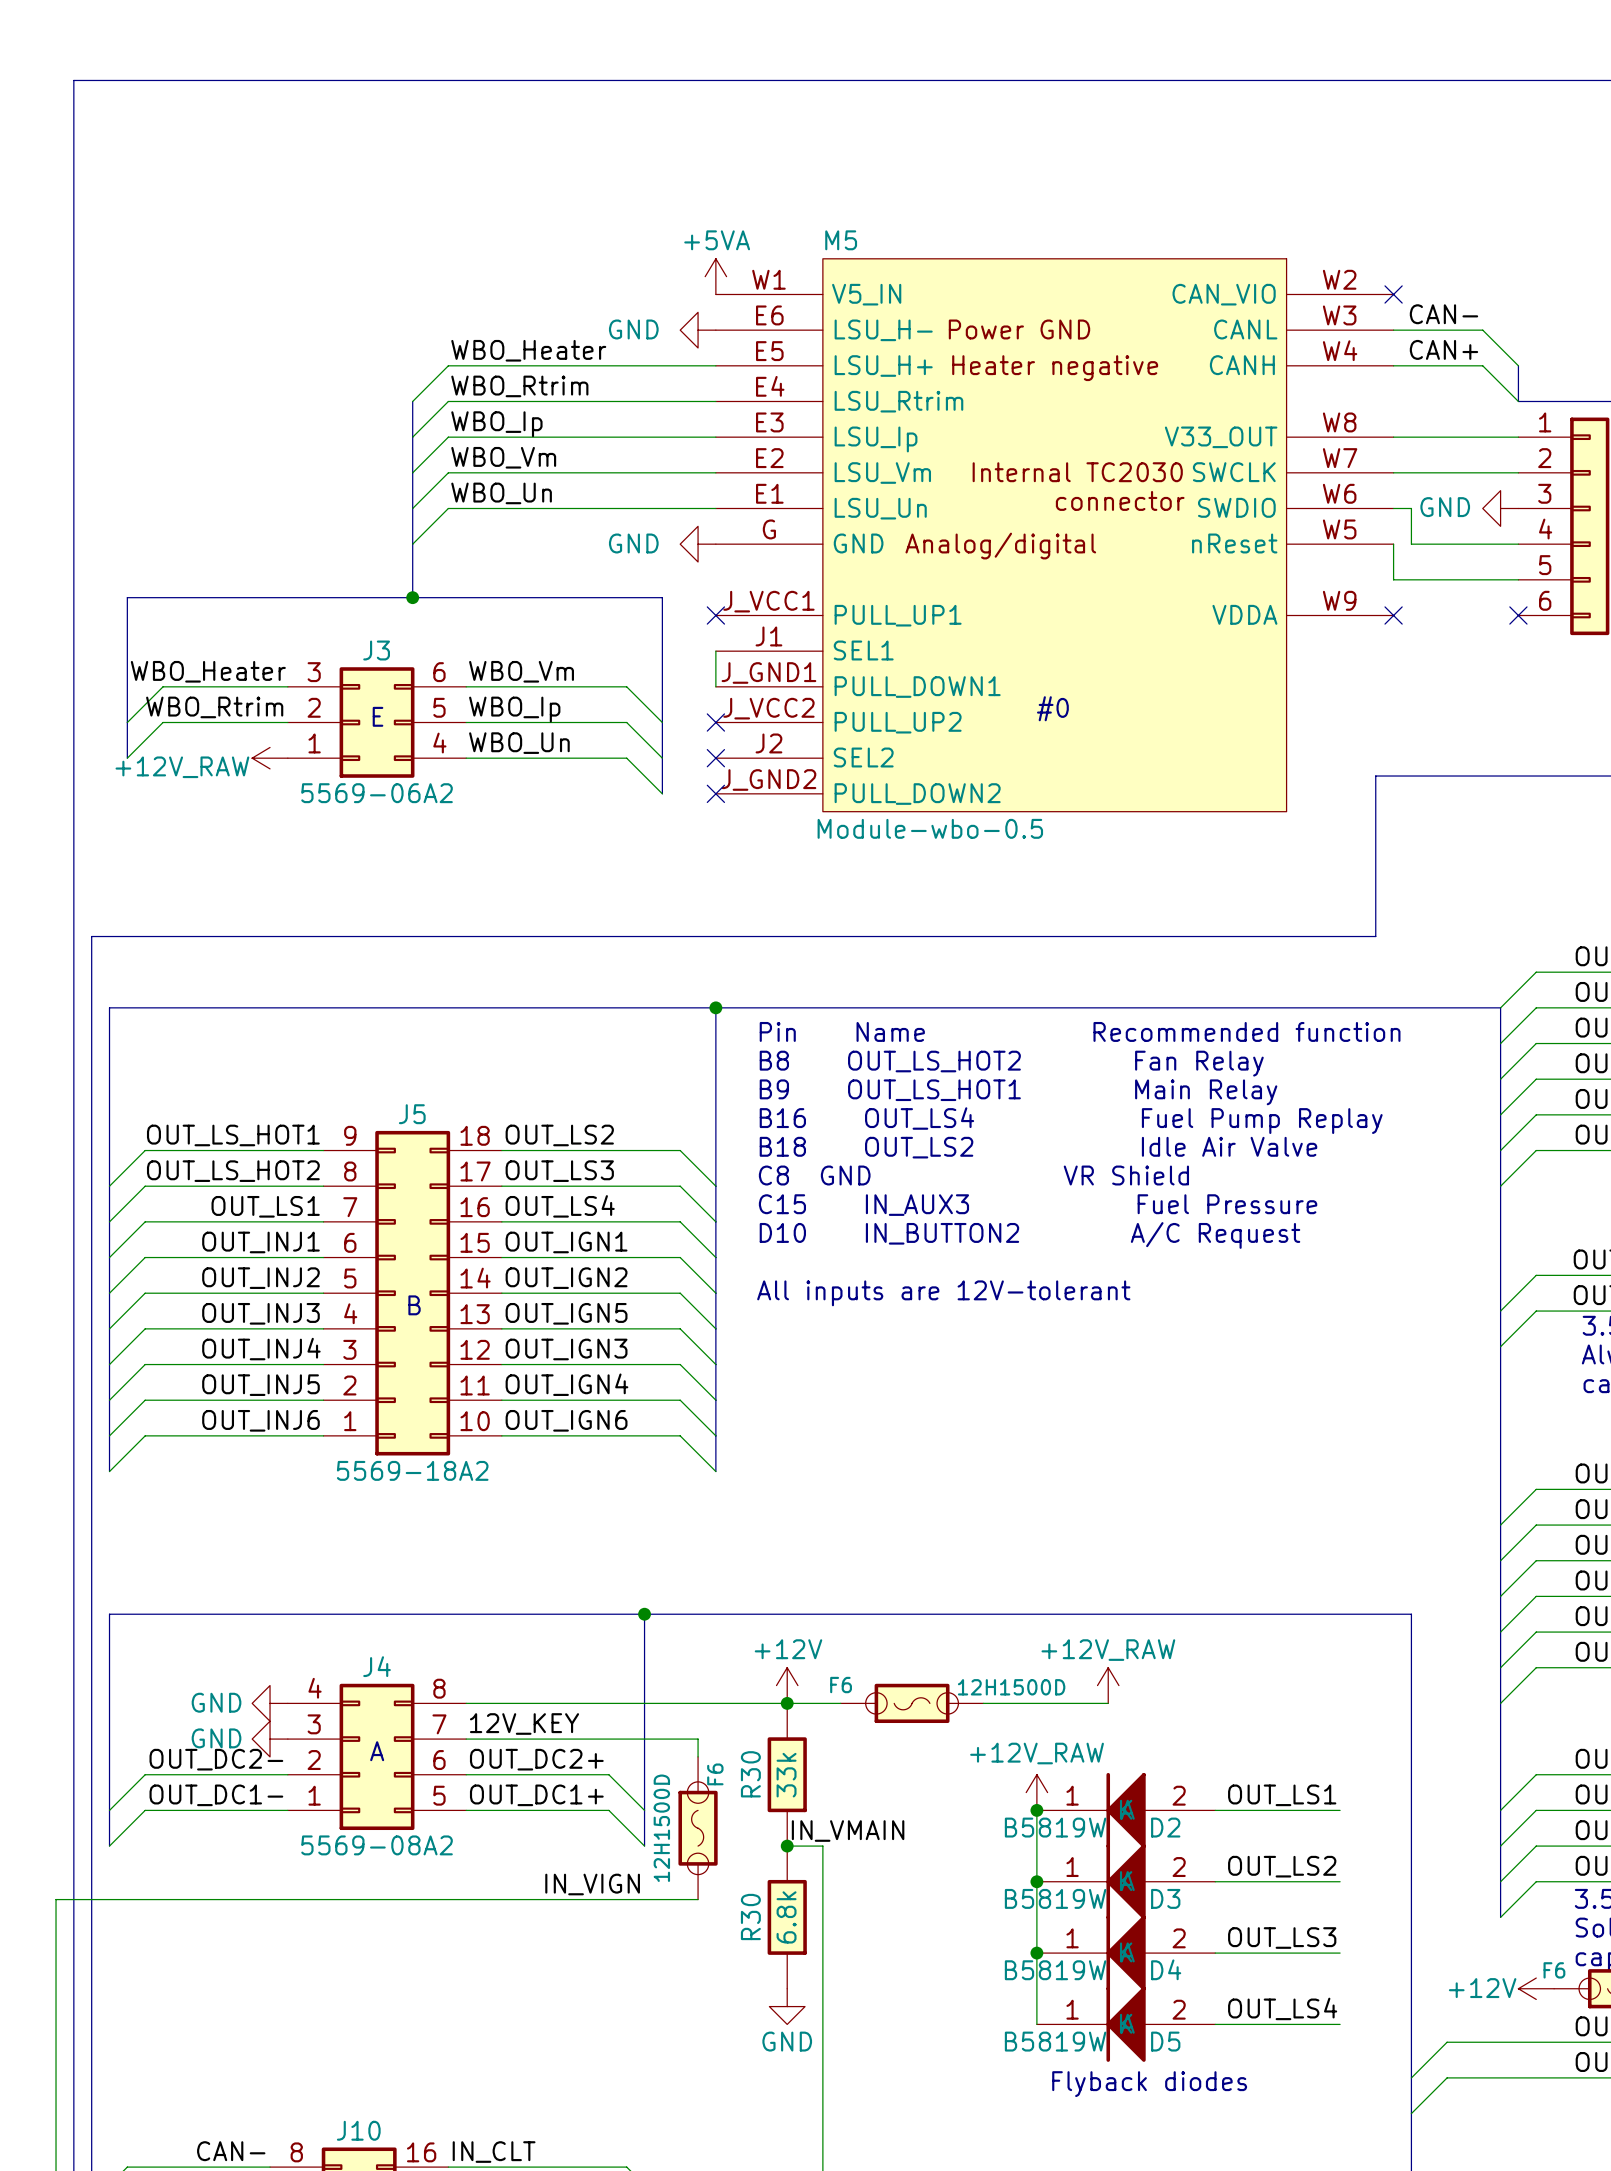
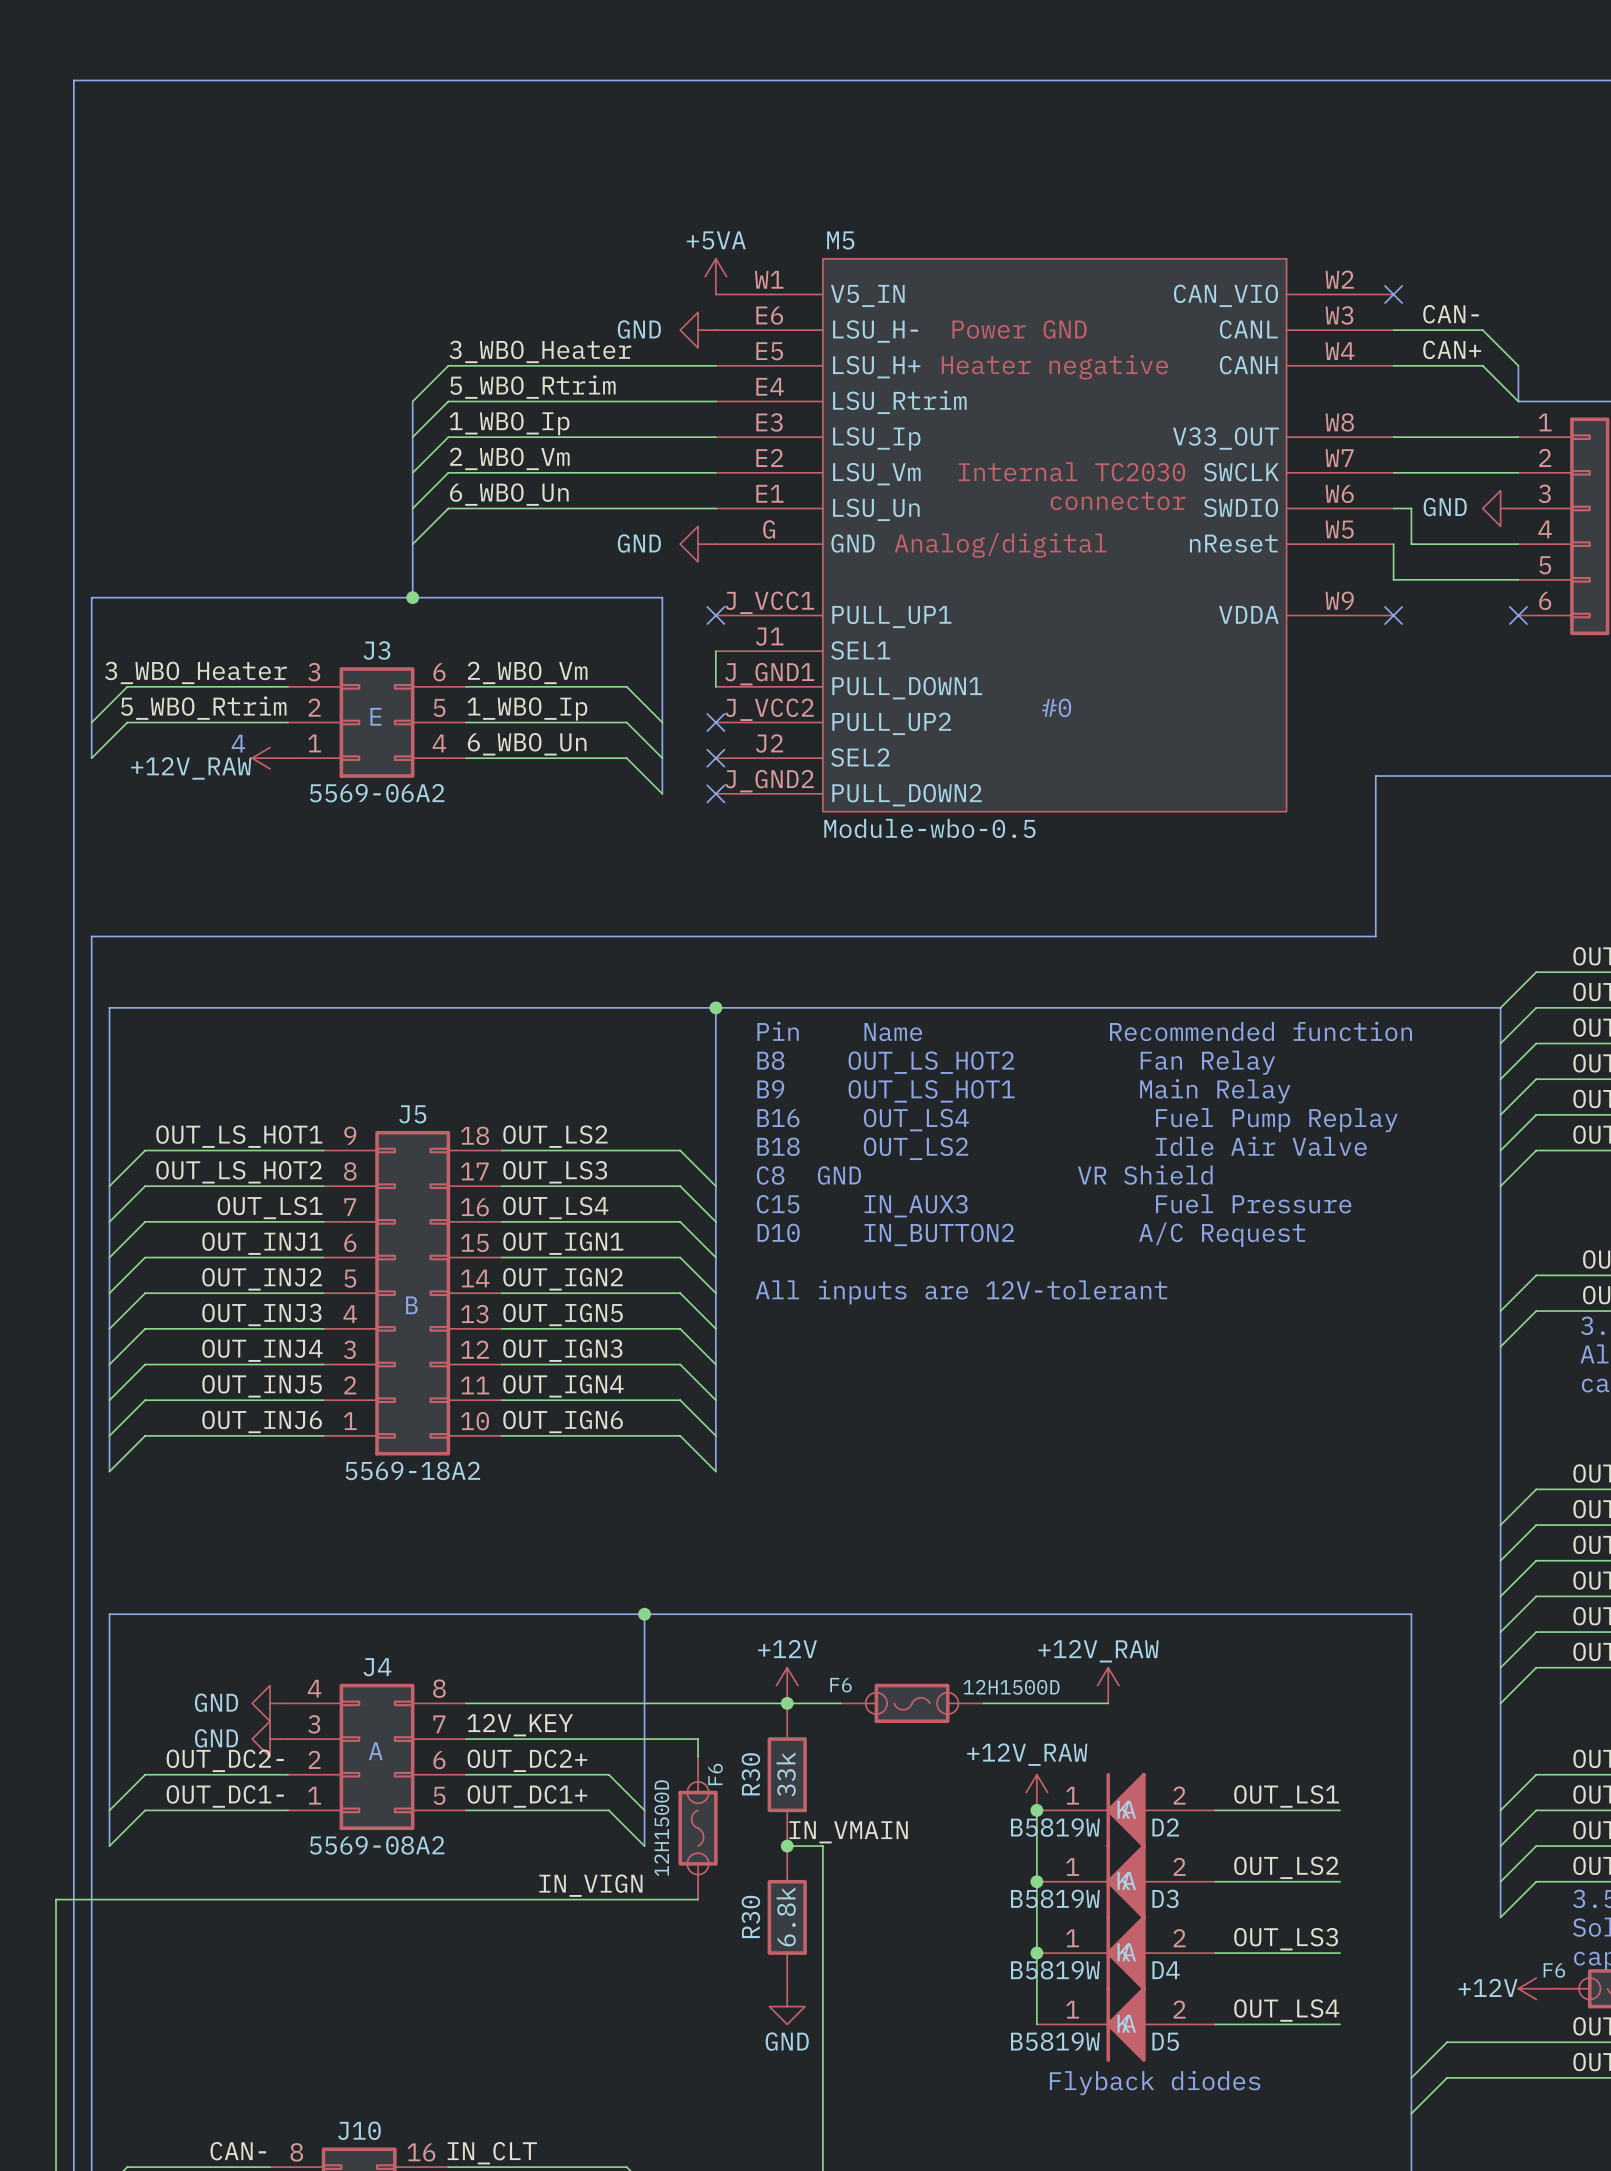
label: WBO_Heater (528, 350) -> 3_WBO_Heater (540, 351)
label: WBO_Rtrim (519, 386) -> 5_WBO_Rtrim (532, 387)
label: WBO_Ip (496, 424) -> 1_WBO_Ip (509, 423)
label: WBO_Vm (503, 457) -> 2_WBO_Vm (509, 458)
label: WBO_Un (501, 493) -> 6_WBO_Un (509, 494)
bus: (127, 597) (127, 758) -> (127, 597) (91, 597) (91, 758)
label: WBO_Heater (208, 671) -> 3_WBO_Heater (195, 672)
label: WBO_Vm (521, 671) -> 2_WBO_Vm (527, 672)
wire: (163, 686) (127, 722) -> (163, 686) (127, 686) (91, 722)
label: WBO_Rtrim (214, 707) -> 5_WBO_Rtrim (203, 708)
label: WBO_Ip (514, 709) -> 1_WBO_Ip (527, 708)
wire: (163, 722) (127, 758) -> (163, 722) (127, 722) (91, 758)
text: none -> 4 (238, 743)
label: WBO_Un (519, 743) -> 6_WBO_Un (527, 744)

